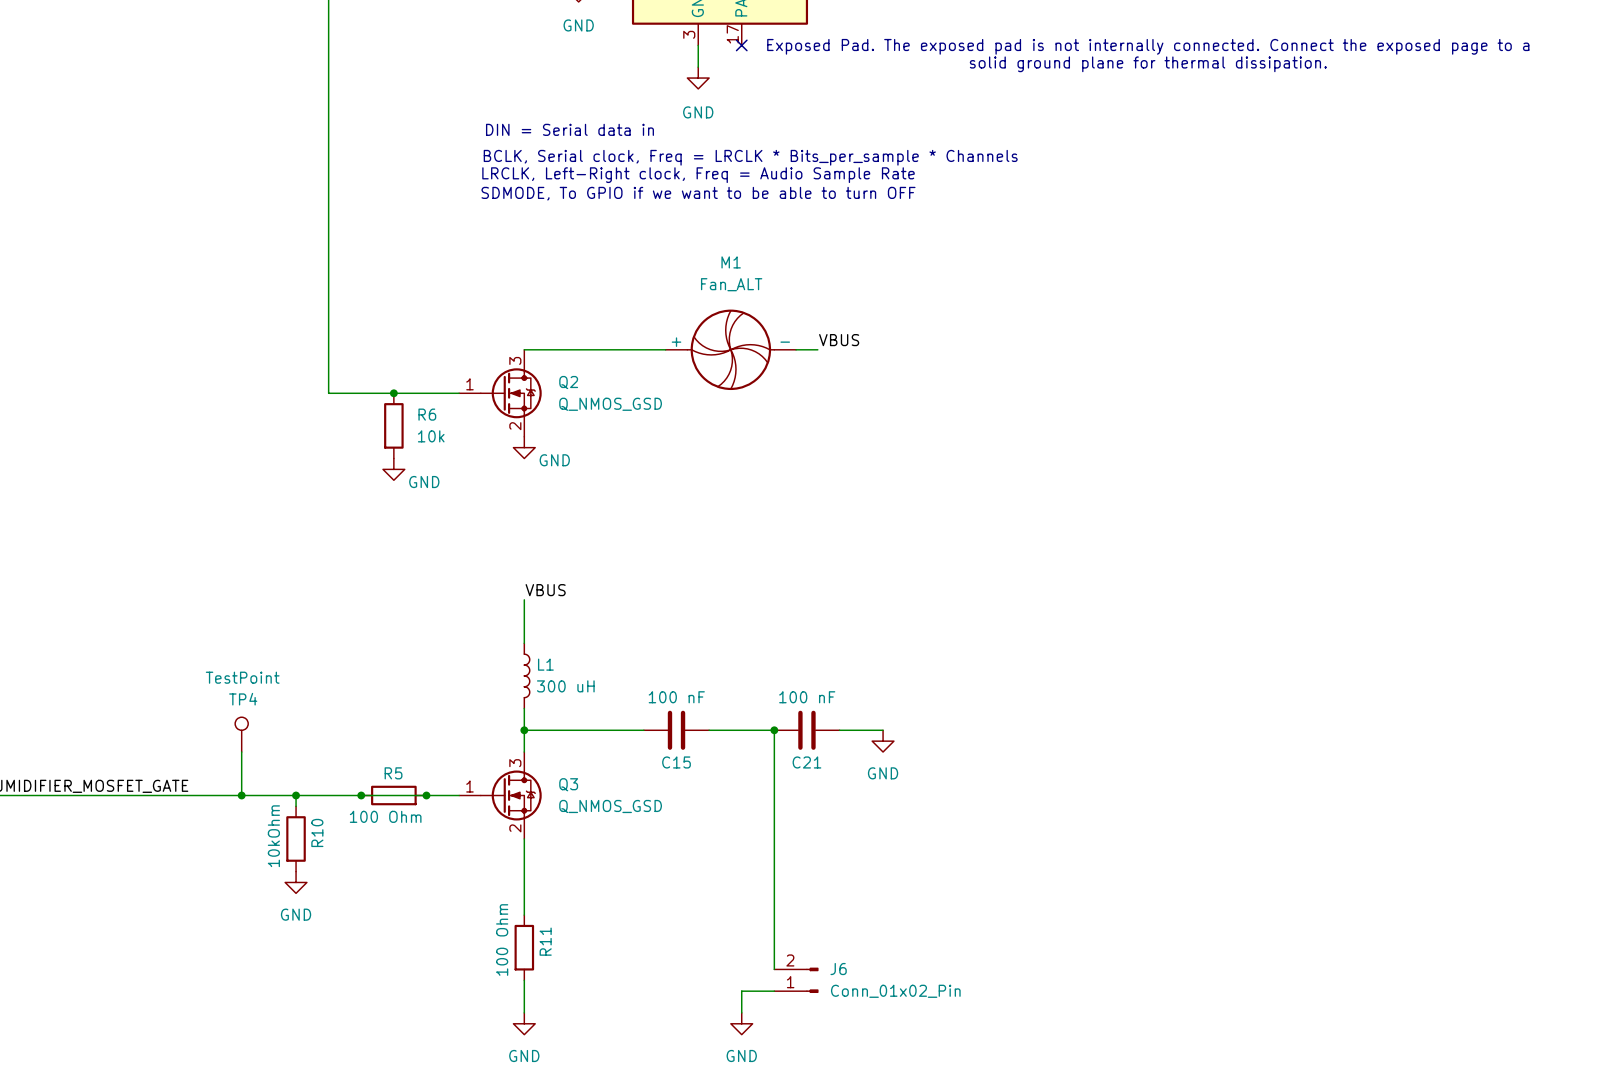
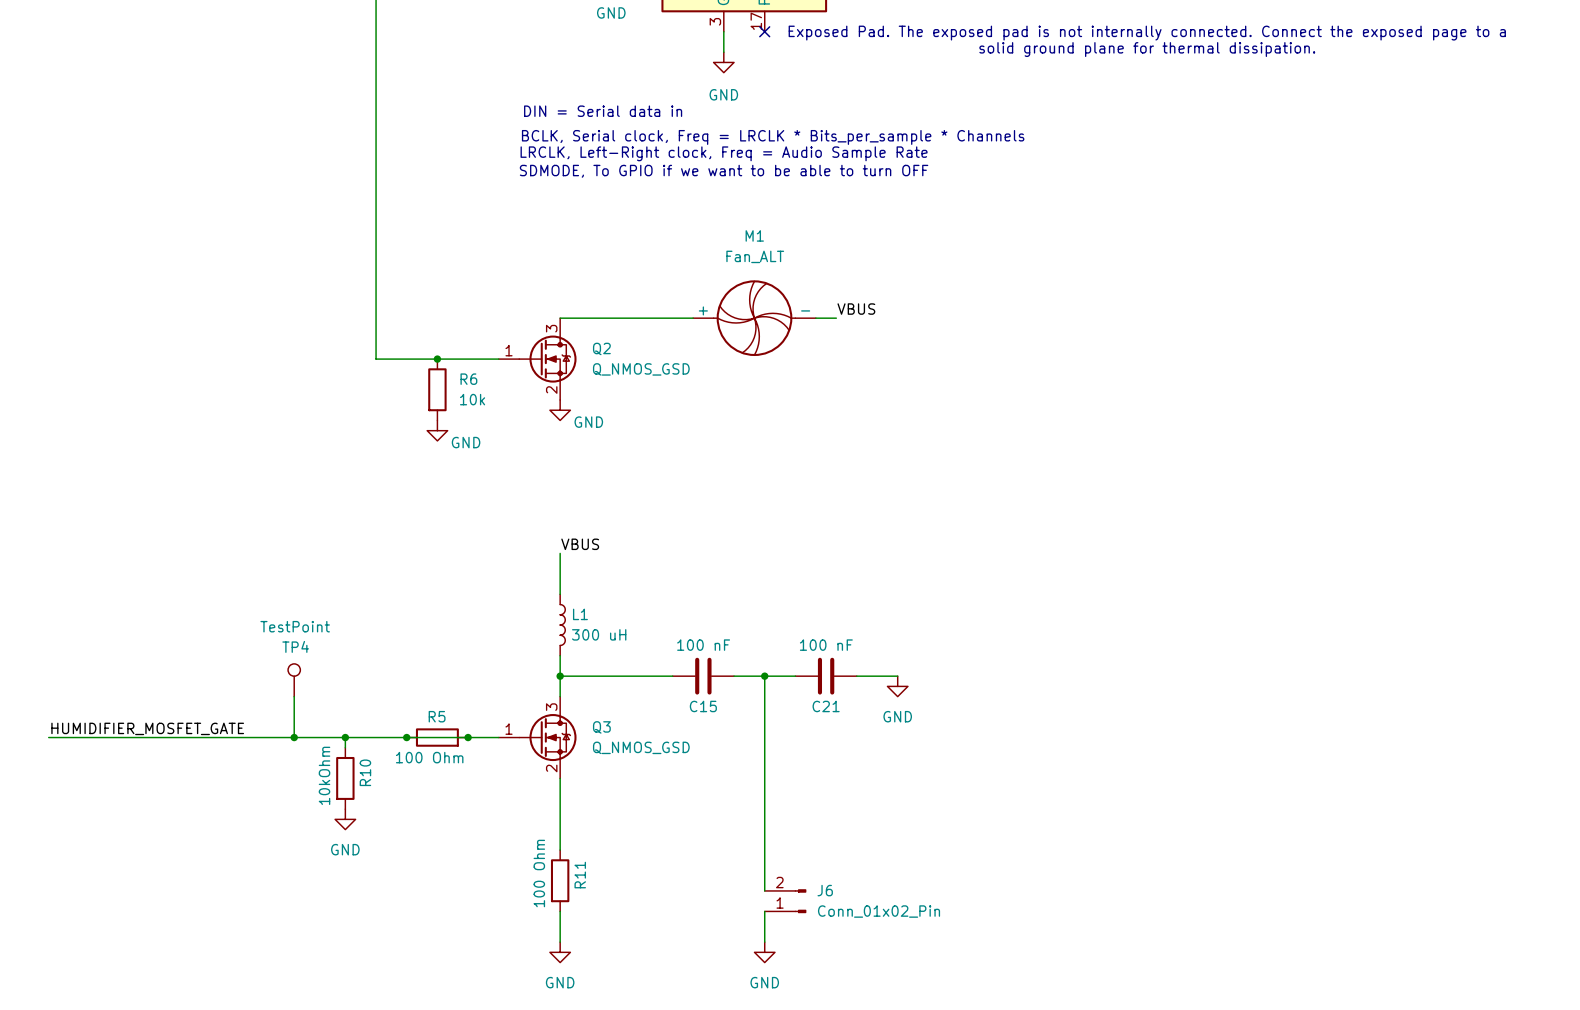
wire: none -> (764, 676) (764, 890)
wire: (774, 730) (774, 969) -> none
junction position: (774, 730) -> (764, 676)
J6 position: (796, 980) -> (785, 901)
wire: (741, 991) (774, 991) -> (764, 921) (764, 911)

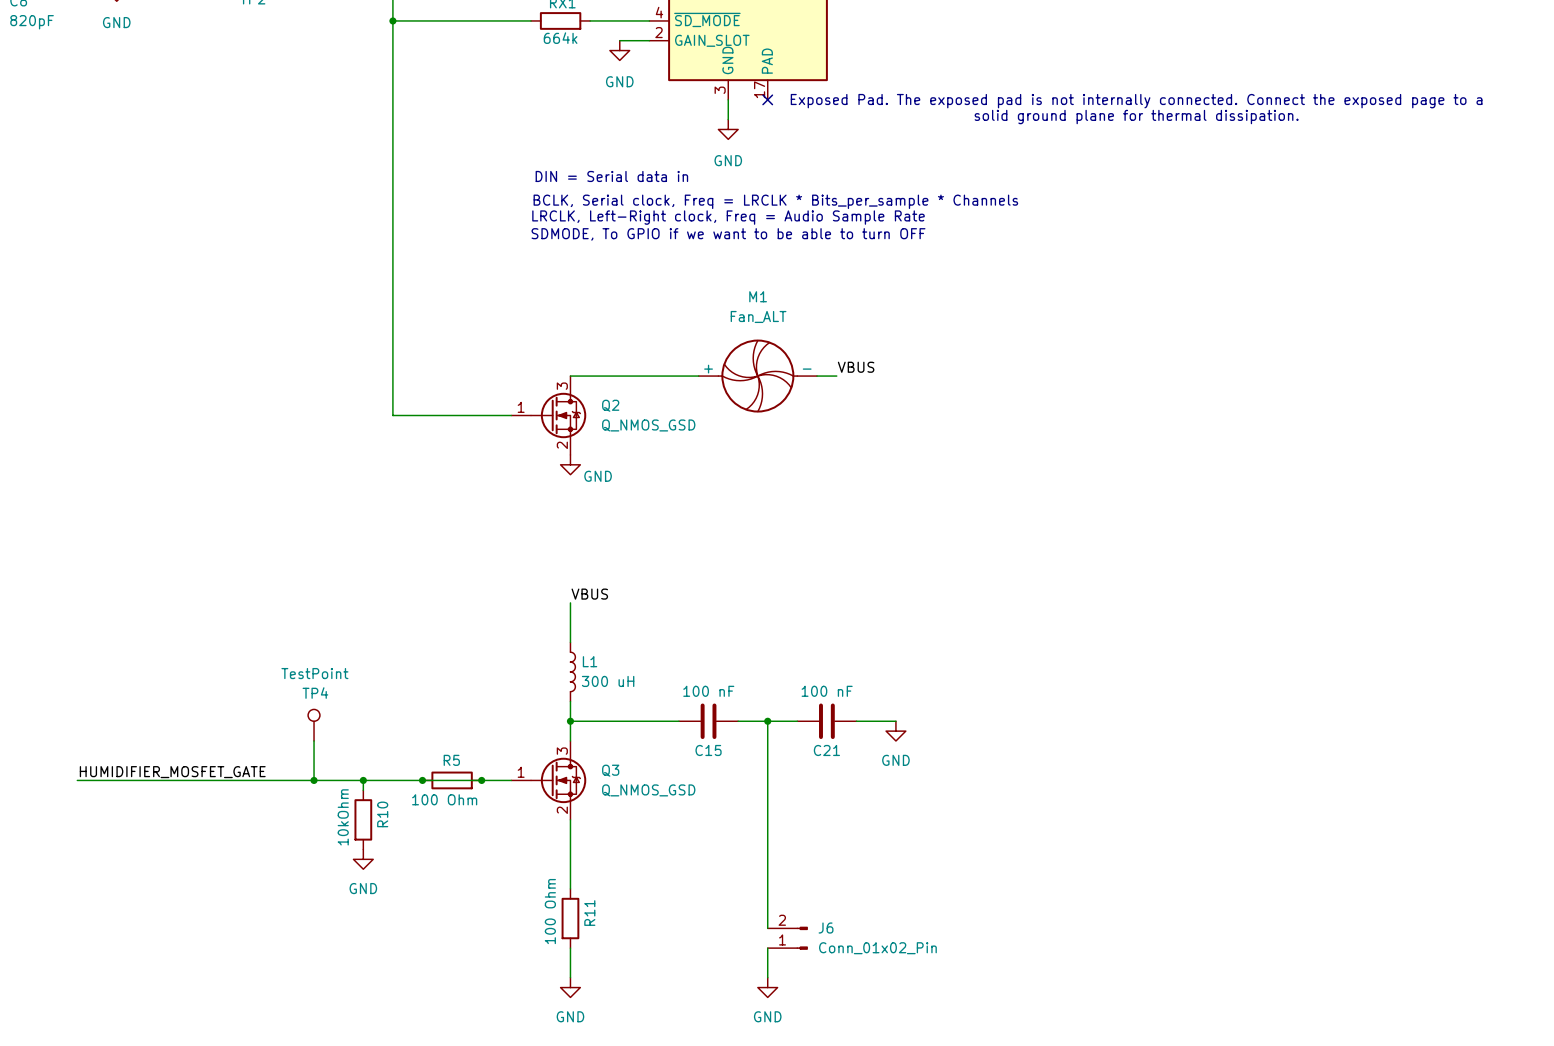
junction: (437, 359) -> none
R6: 10k (437, 389) -> none
power symbol: GND (437, 430) -> none

